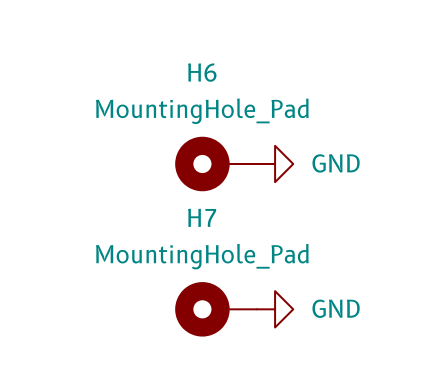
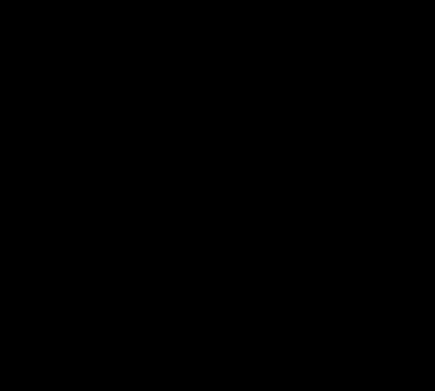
H6: MountingHole_Pad (216, 163) -> none
power symbol: GND (275, 163) -> none
H7: MountingHole_Pad (216, 309) -> none
power symbol: GND (275, 309) -> none

